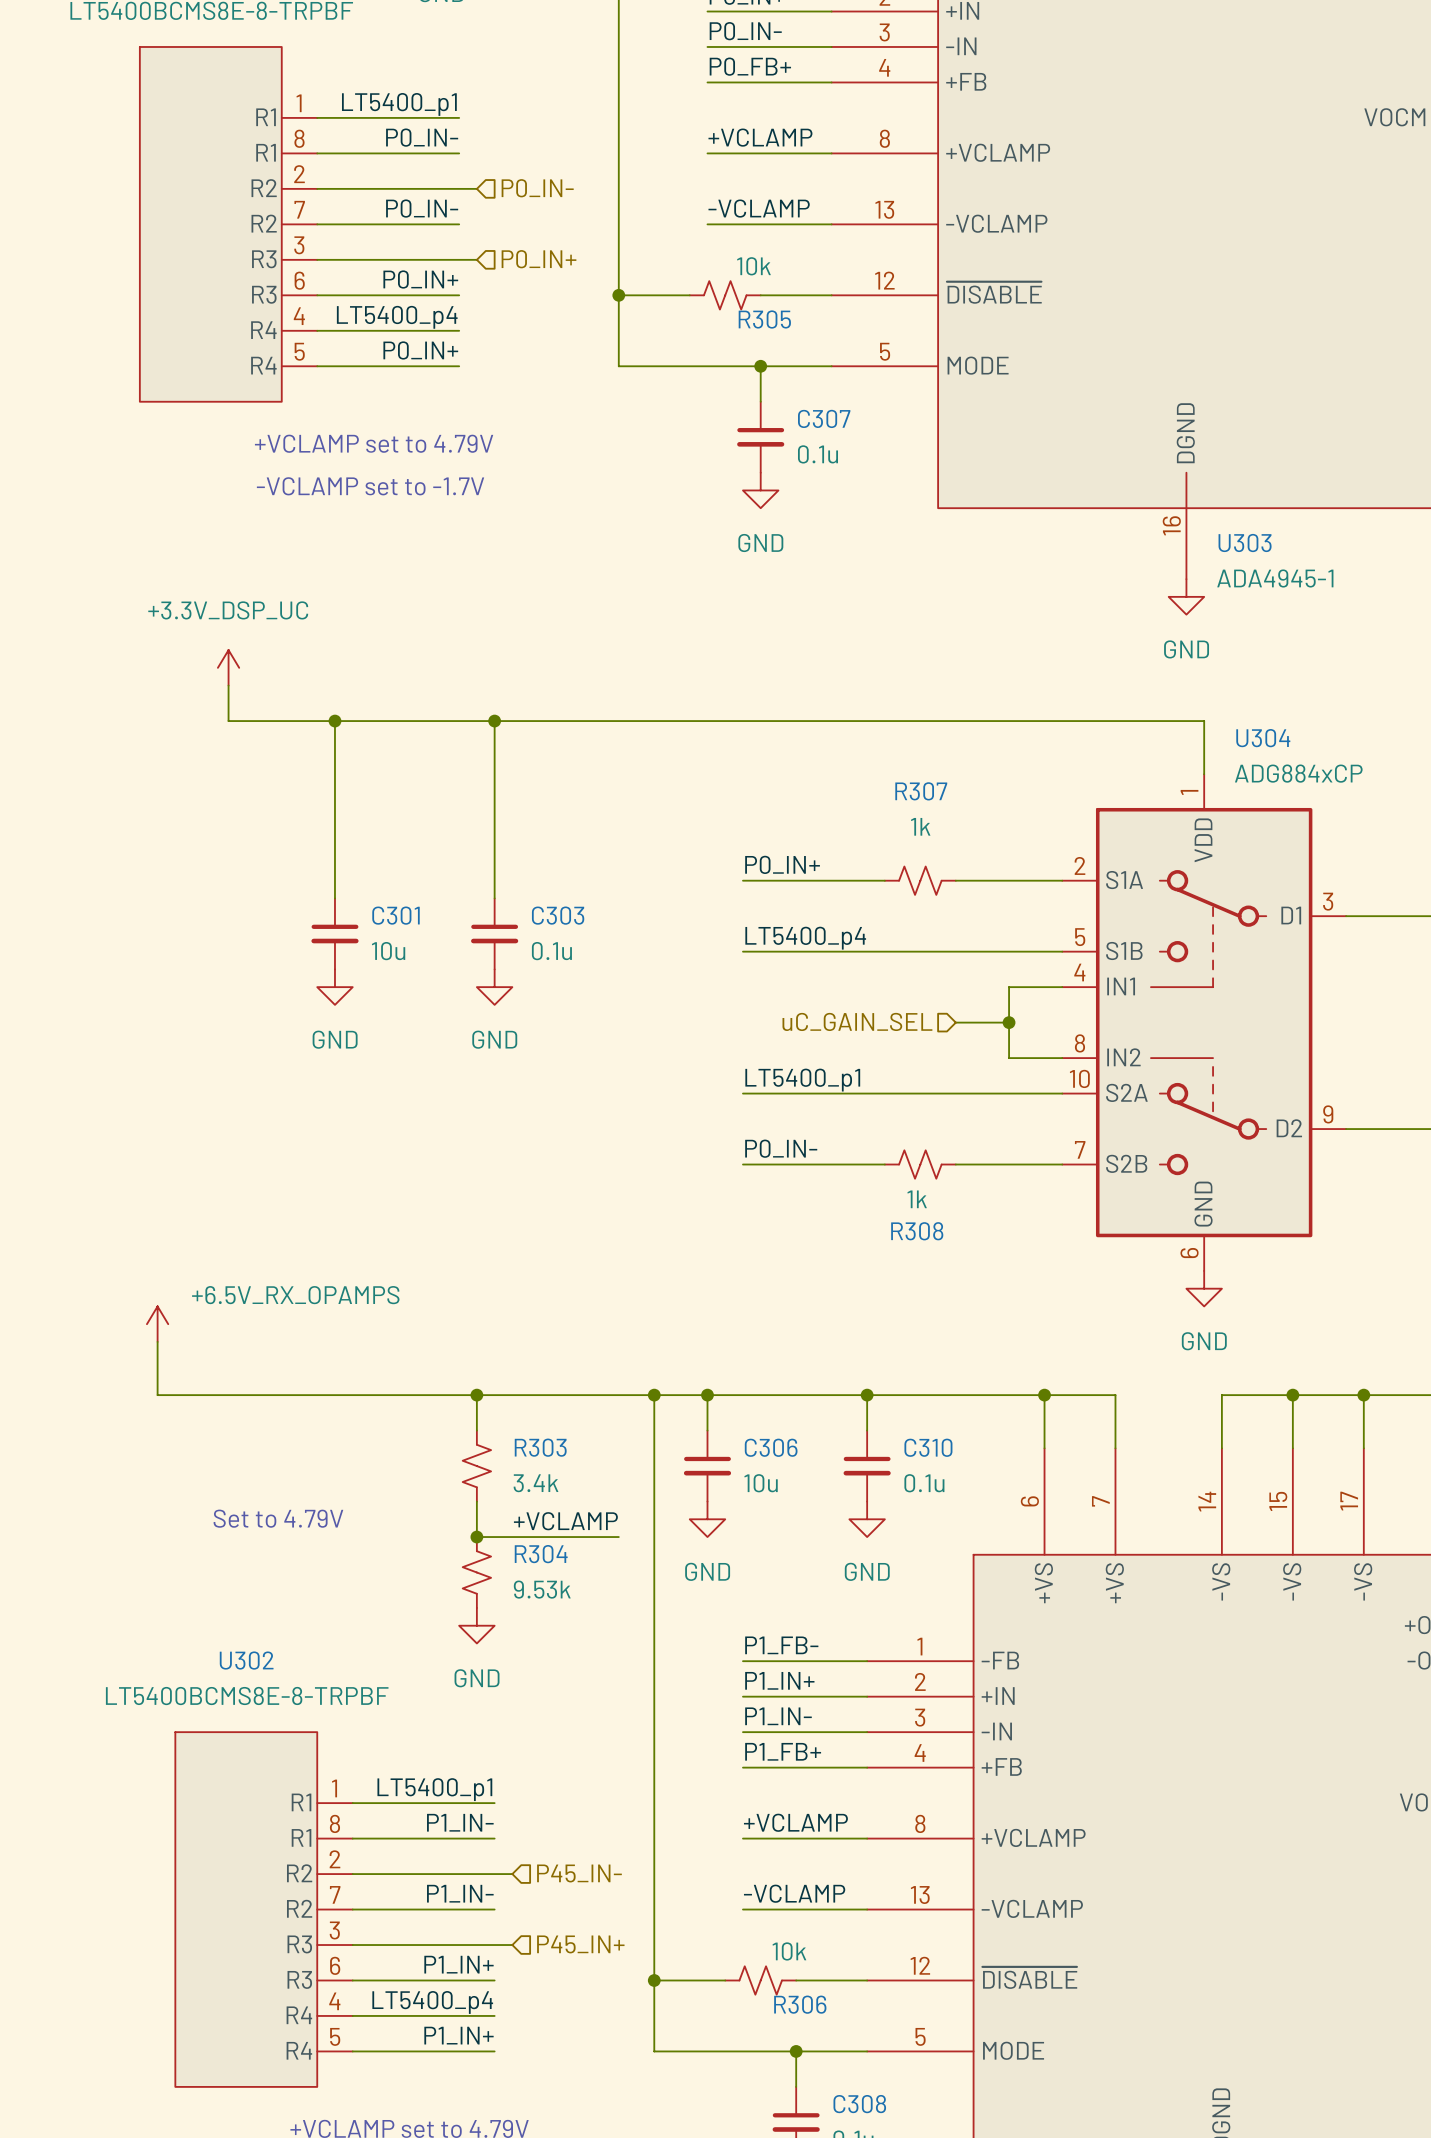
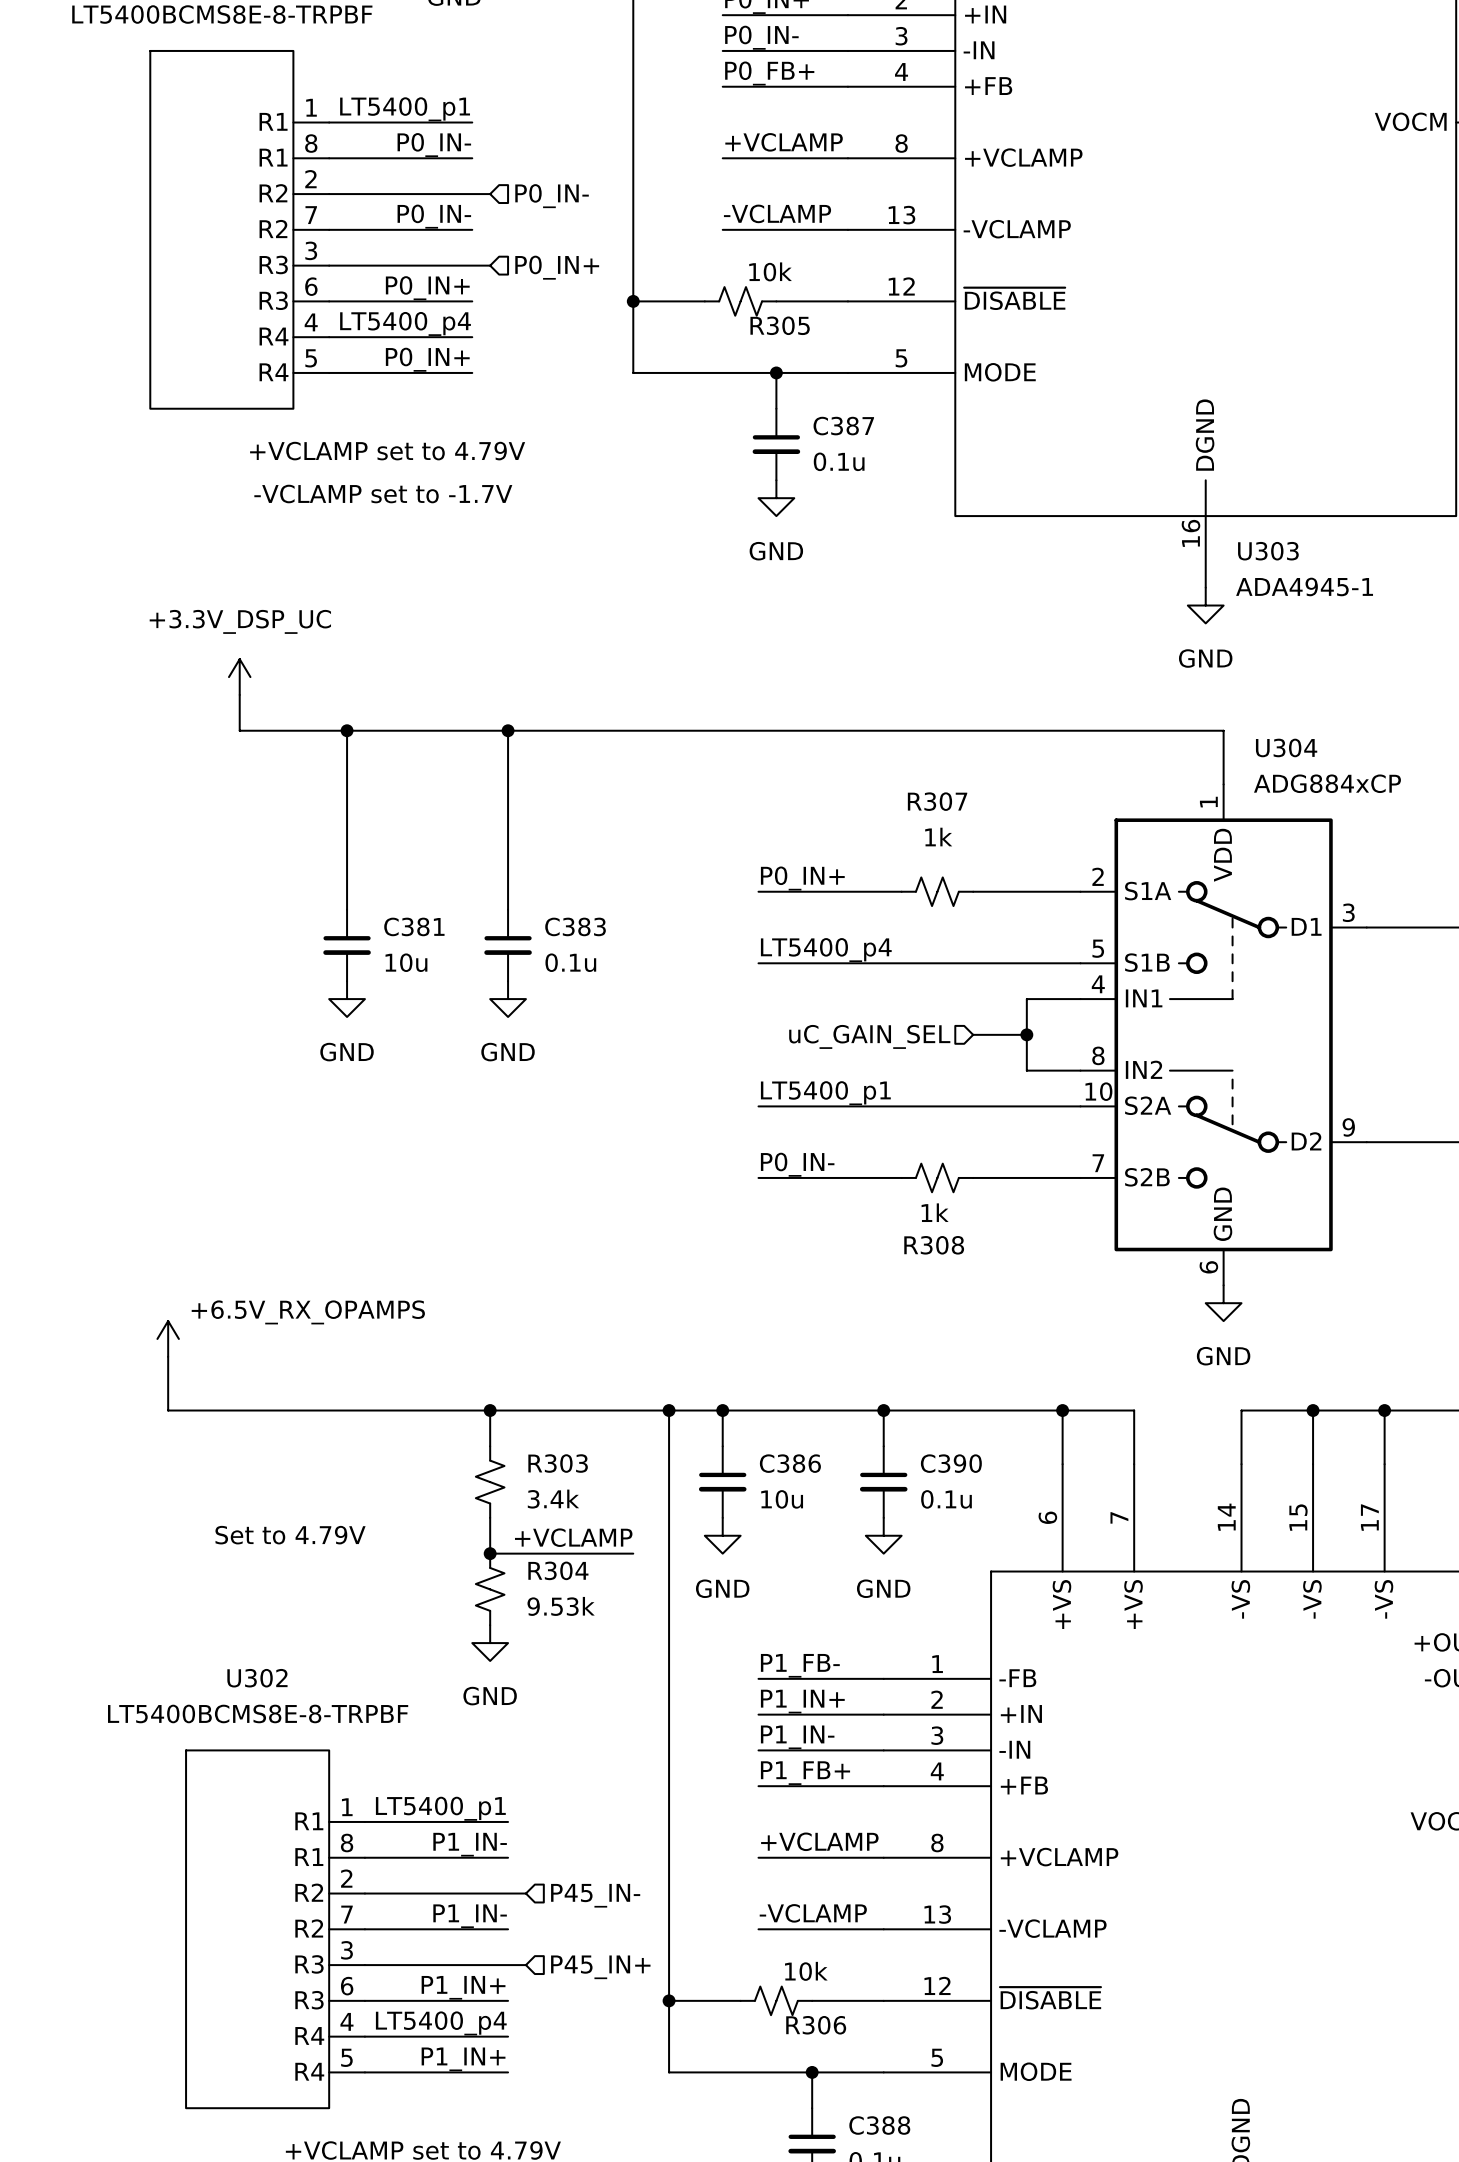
C307 name: C307 (824, 418) -> C387 (843, 426)
C301 name: C301 (396, 915) -> C381 (414, 926)
C303 name: C303 (558, 915) -> C383 (575, 926)
C306 name: C306 (771, 1447) -> C386 (790, 1463)
C310 name: C310 (928, 1447) -> C390 (951, 1463)
C308 name: C308 (859, 2104) -> C388 (879, 2125)

